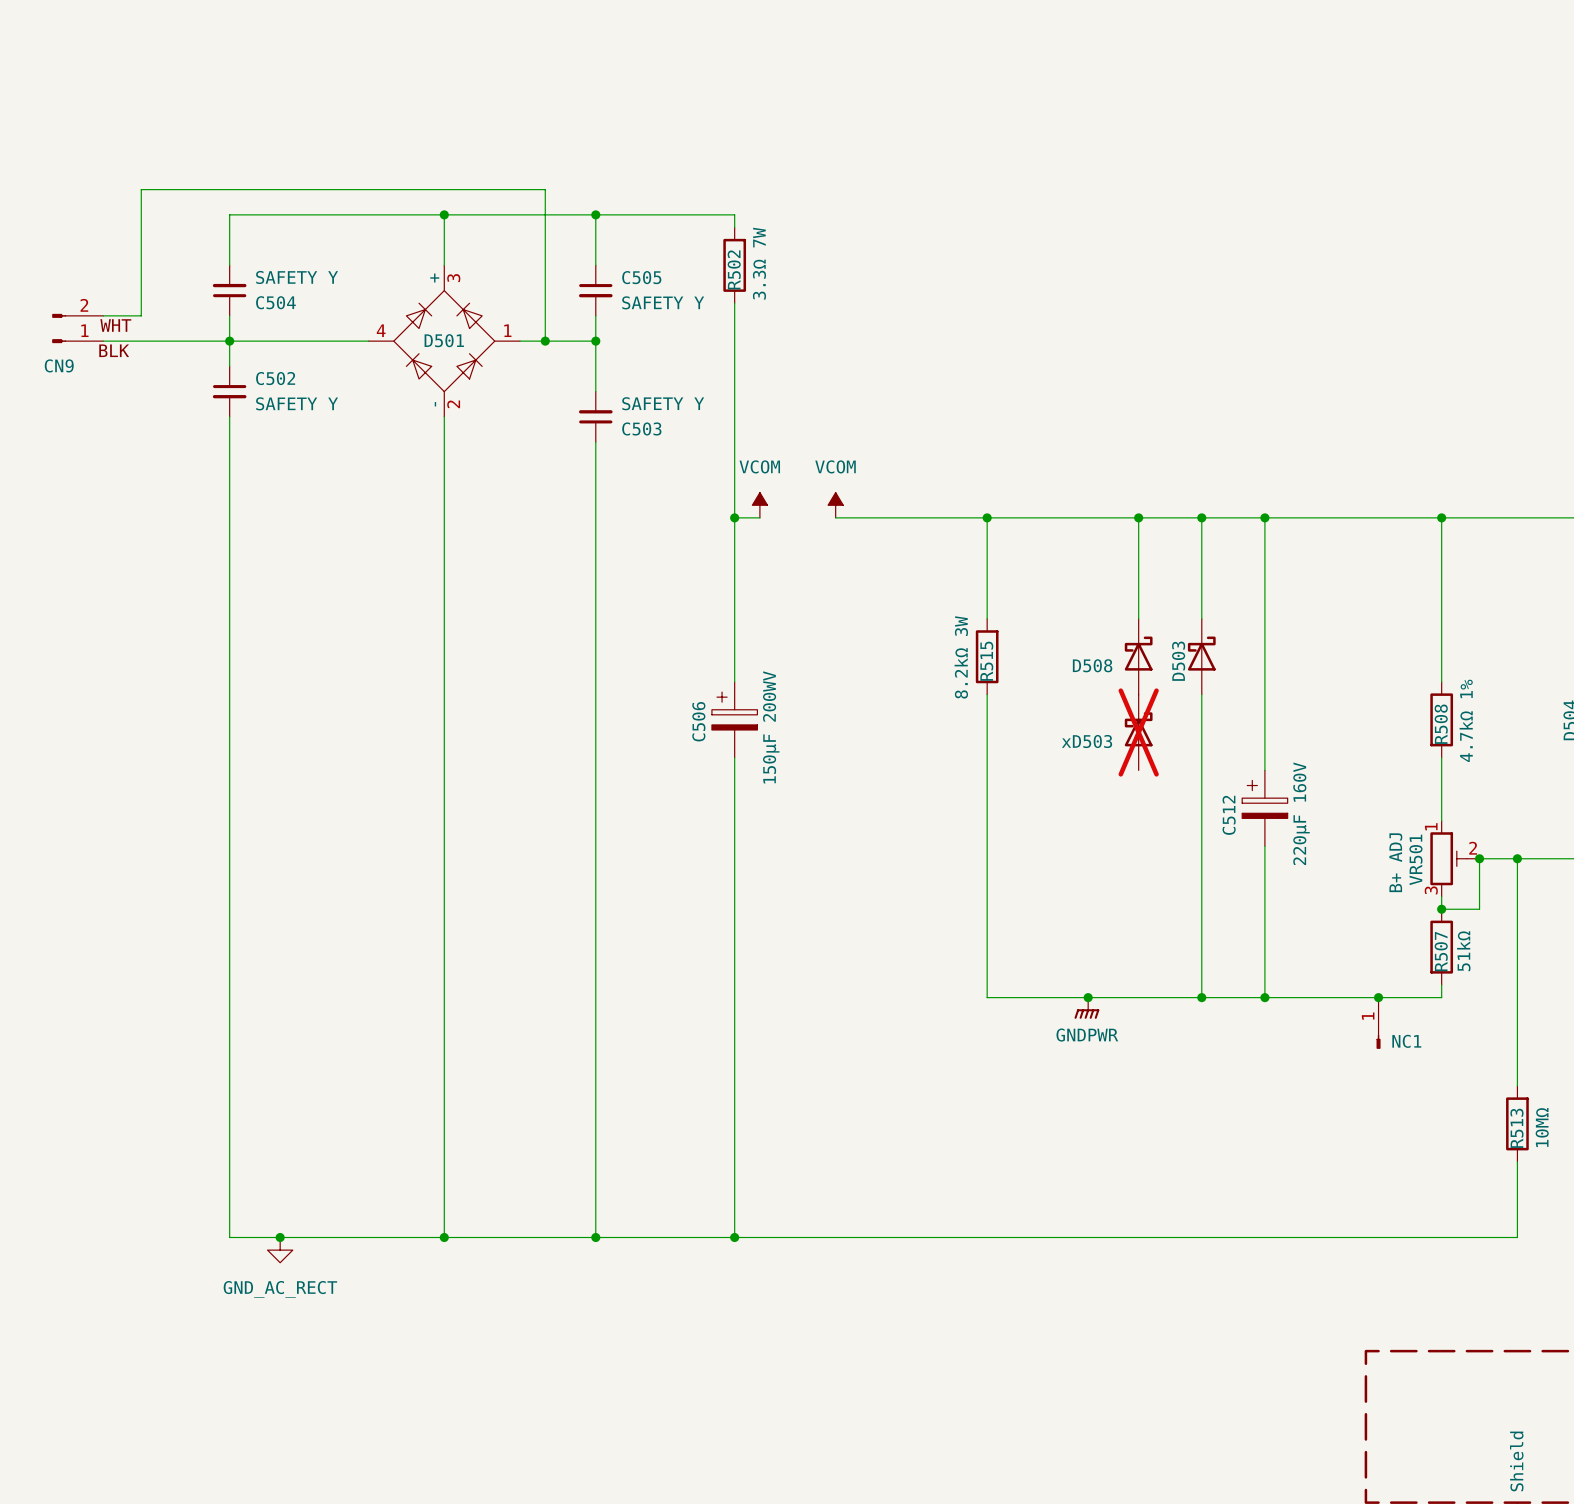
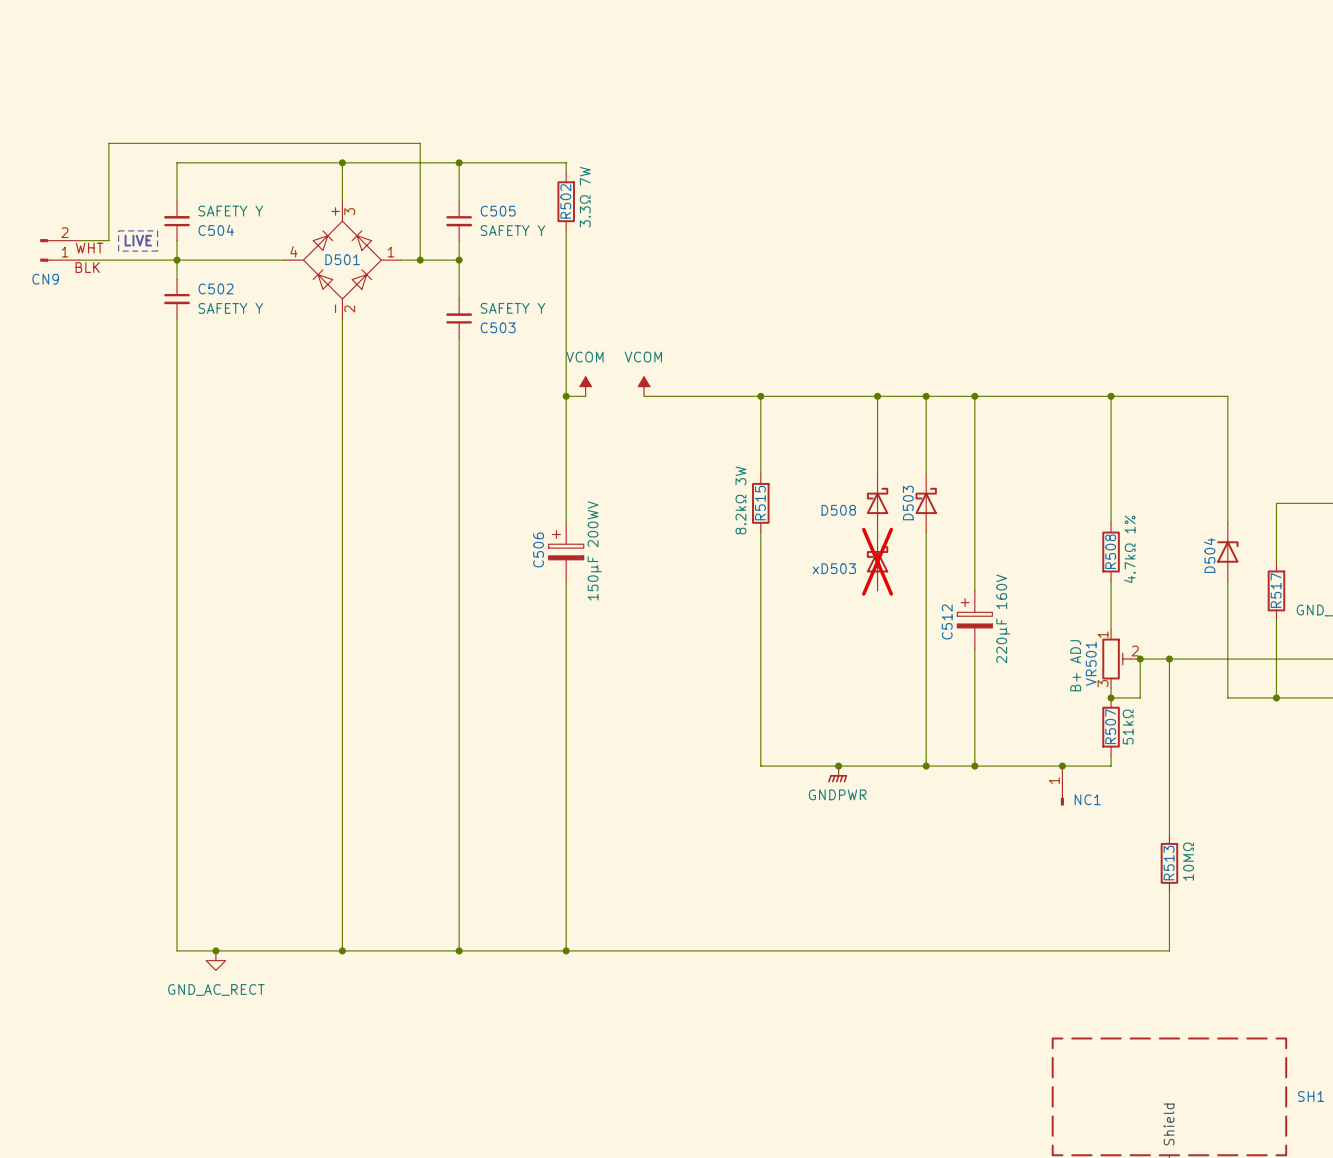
line: none -> (118, 230) (157, 230) (157, 251) (118, 251) (118, 230)
text: none -> LIVE (138, 240)

